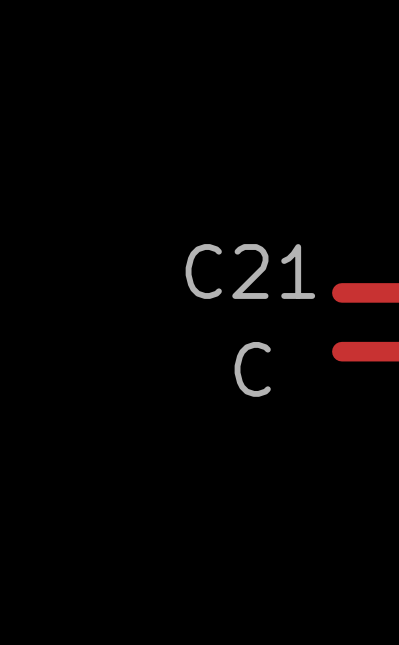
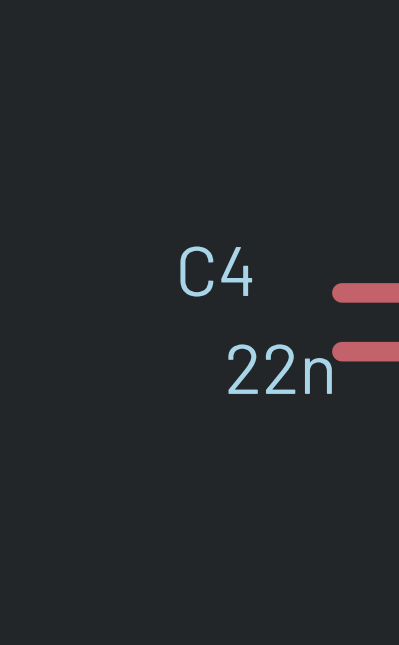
C21 name: C21 (250, 271) -> C4 (216, 271)
C21 value: C (252, 369) -> 22n (280, 369)

